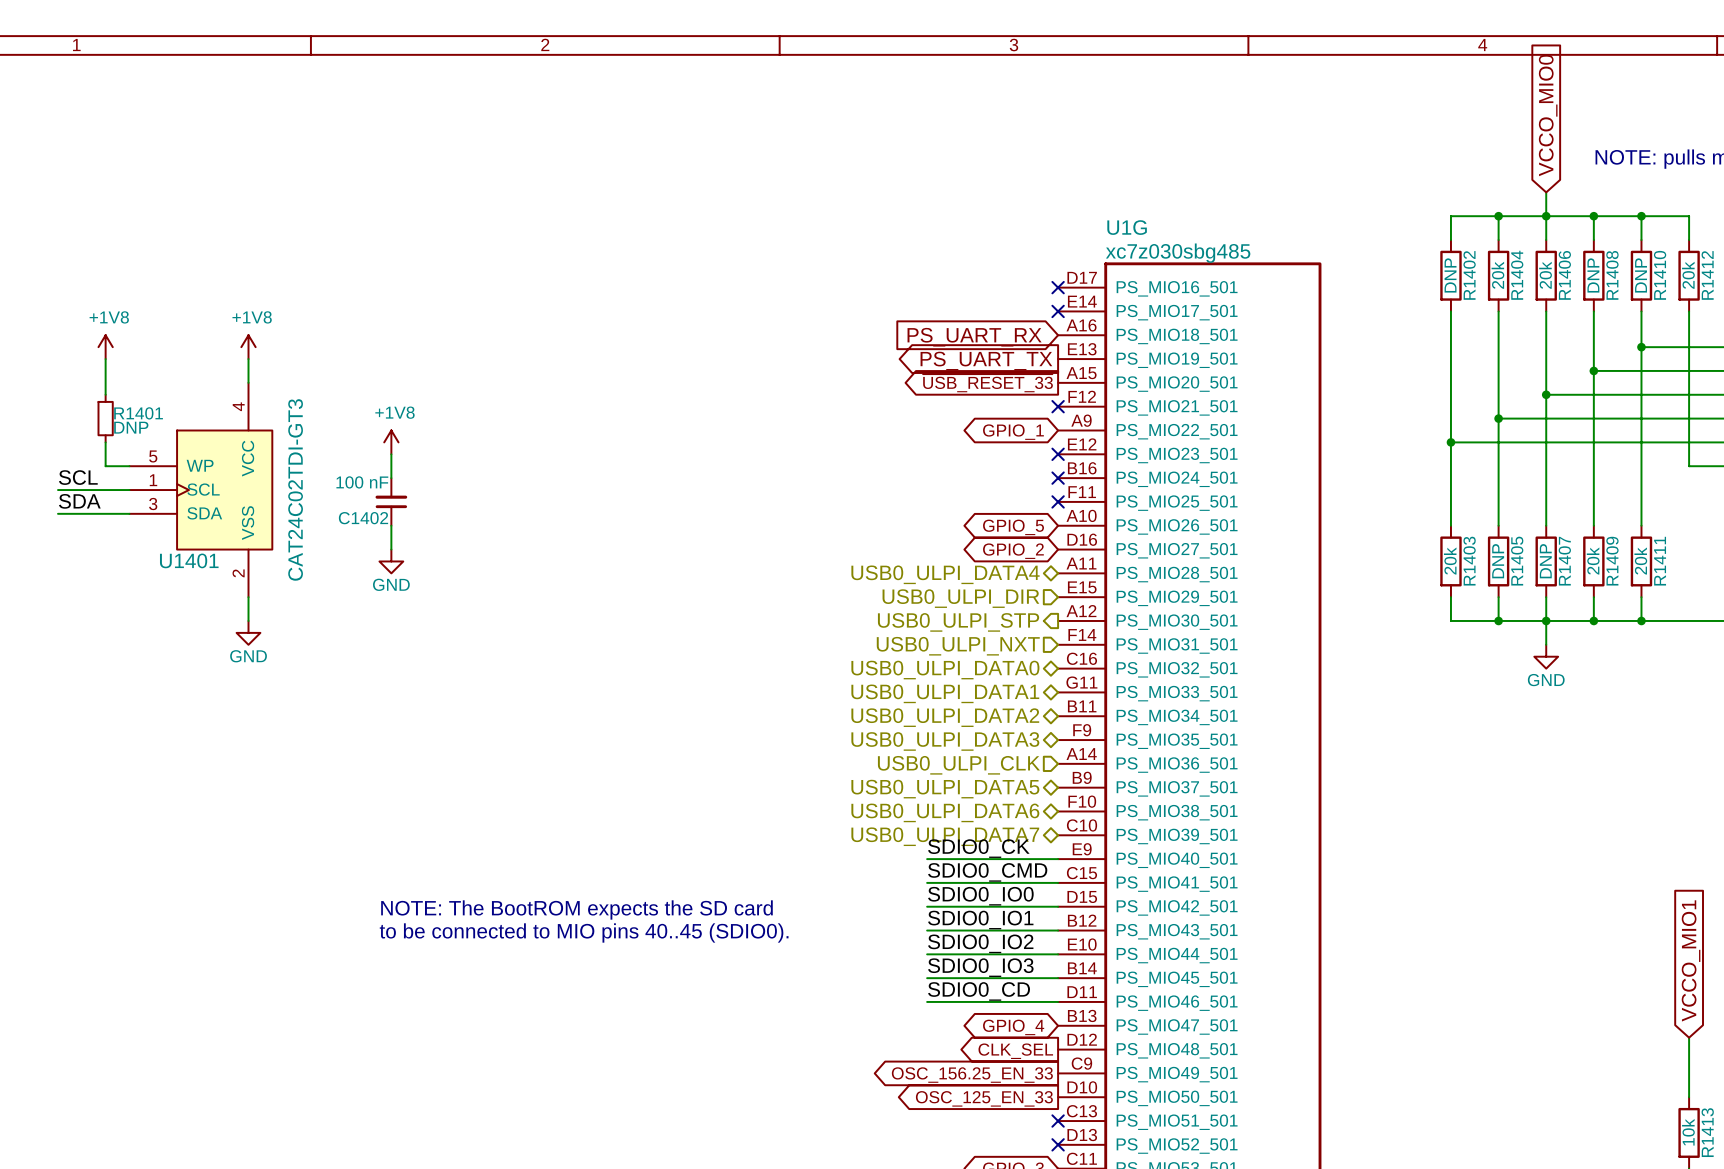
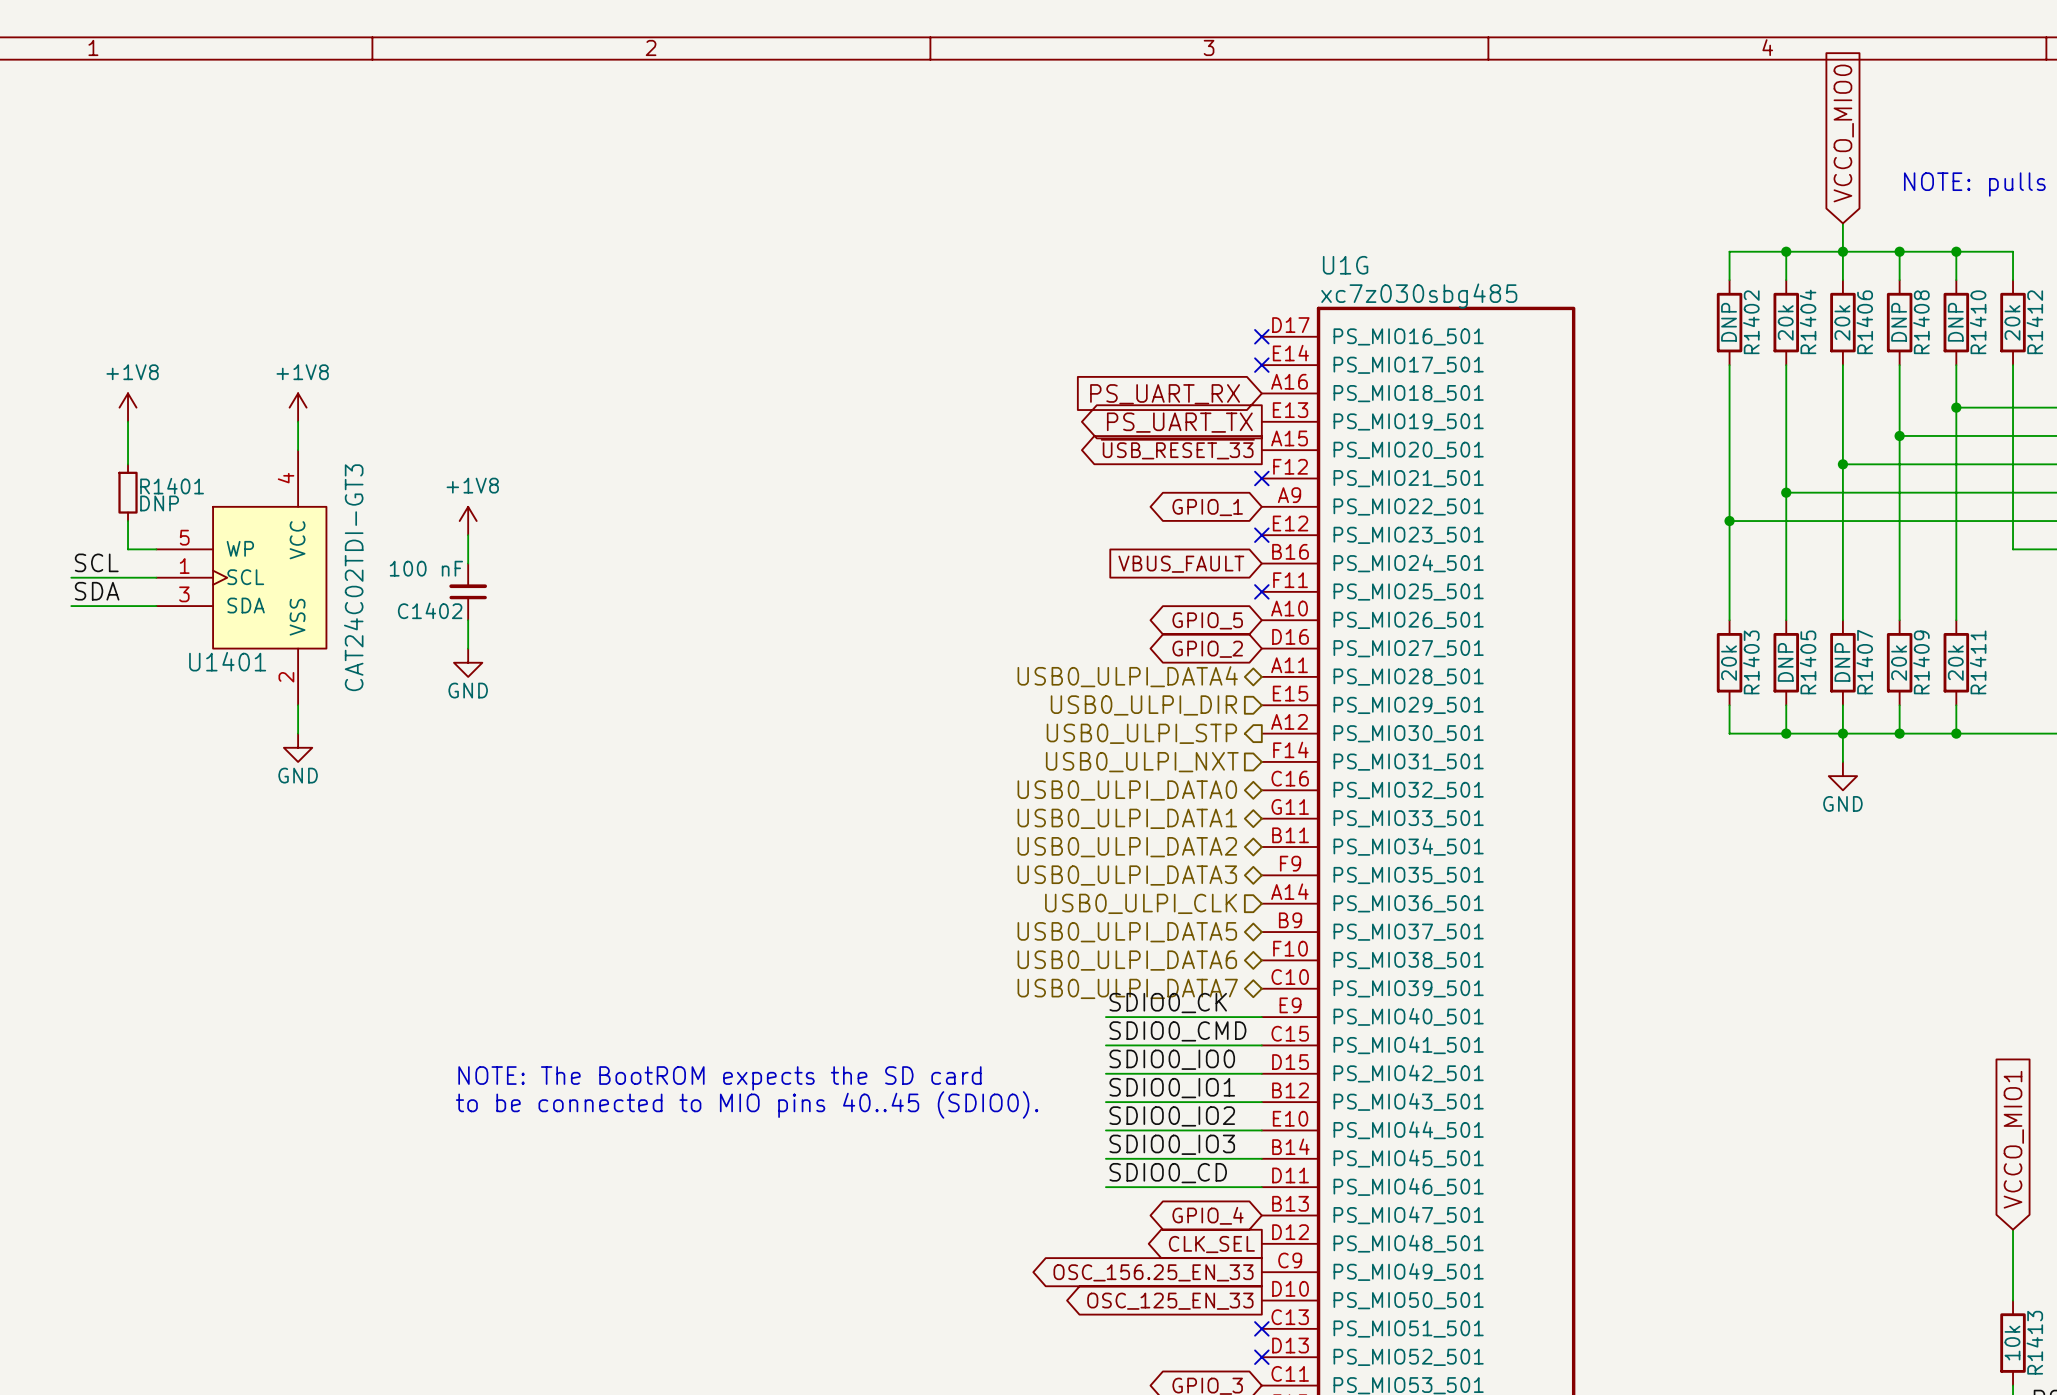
no-connect mark: (1058, 478) -> none
global label: none -> VBUS_FAULT (1181, 564)

